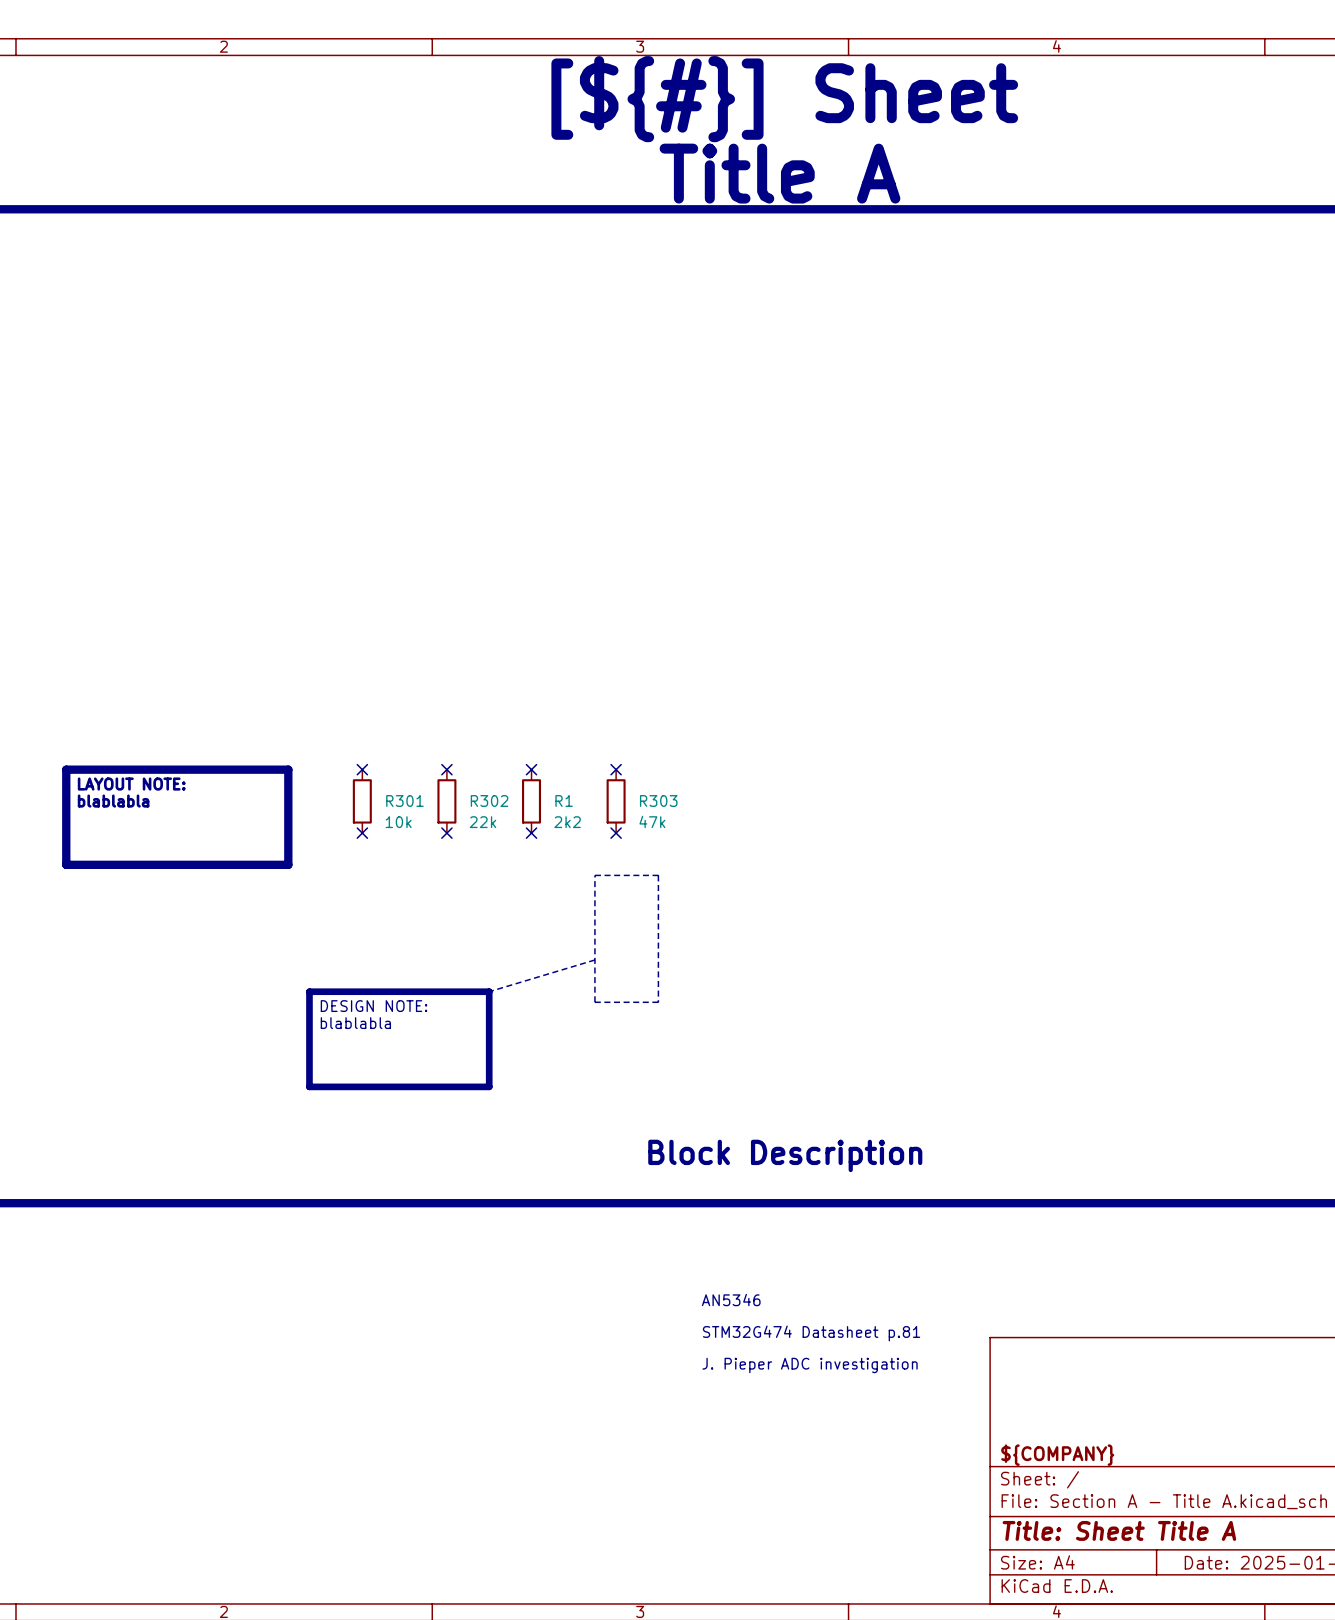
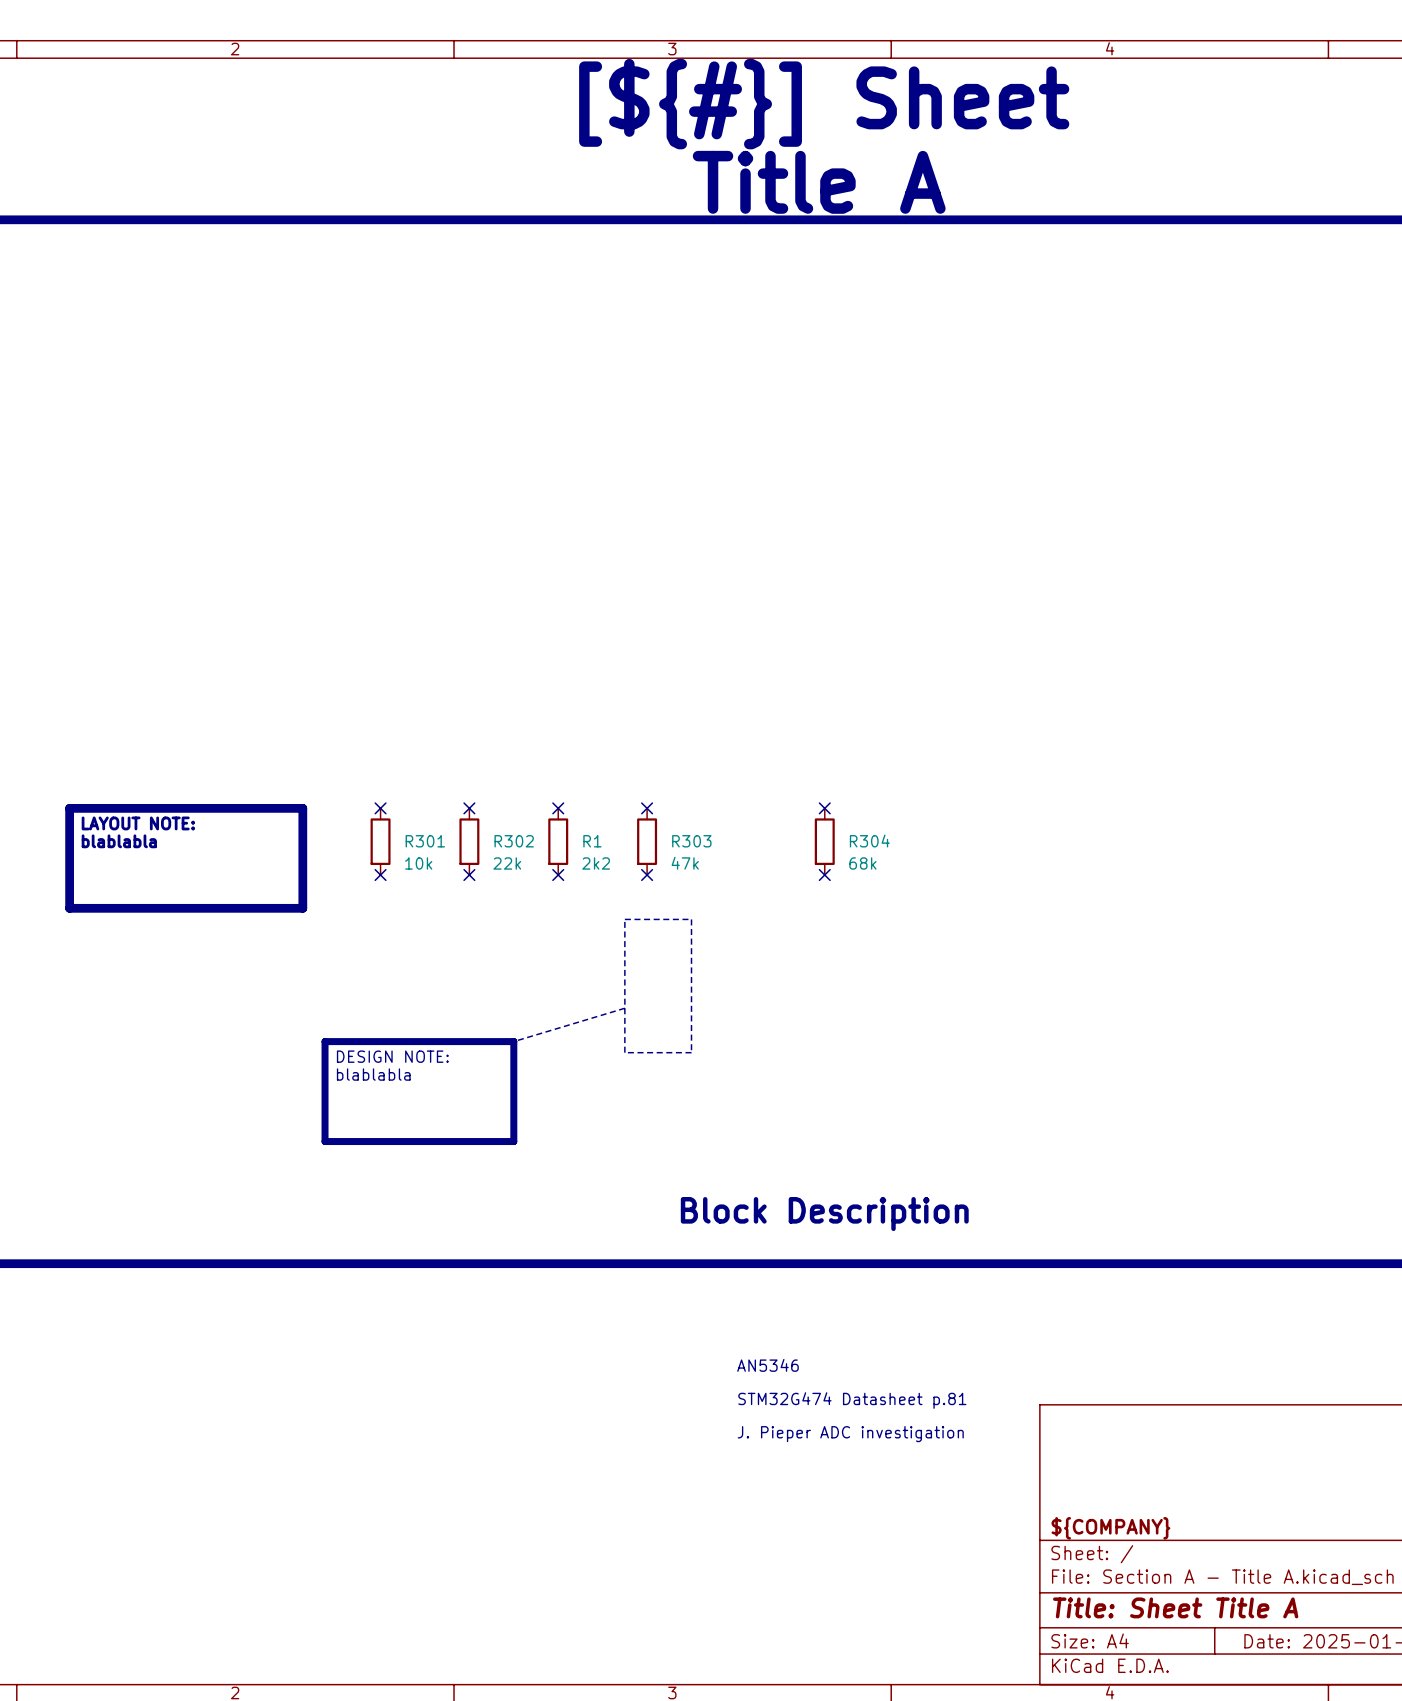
no-connect mark: none -> (824, 808)
R304: none -> 68k (824, 841)
no-connect mark: none -> (824, 875)

